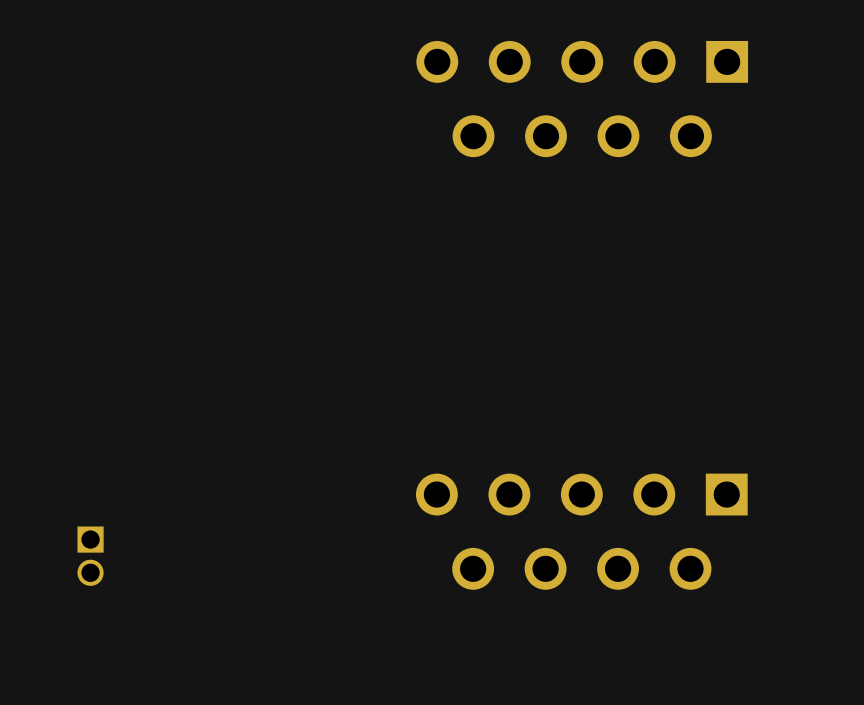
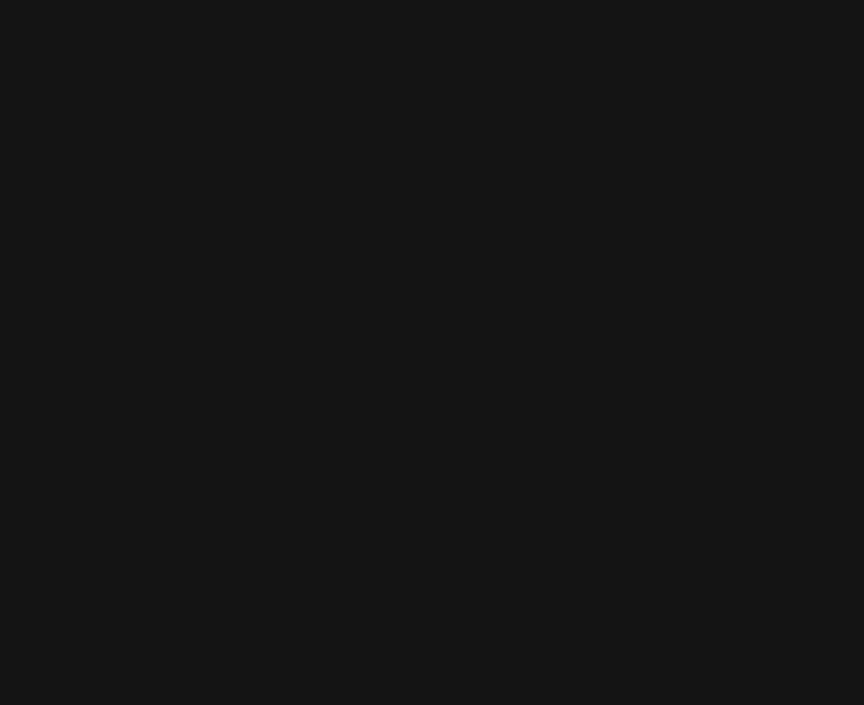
part: (582, 99) -> none
part: (581, 531) -> none
part: (90, 556) -> none

